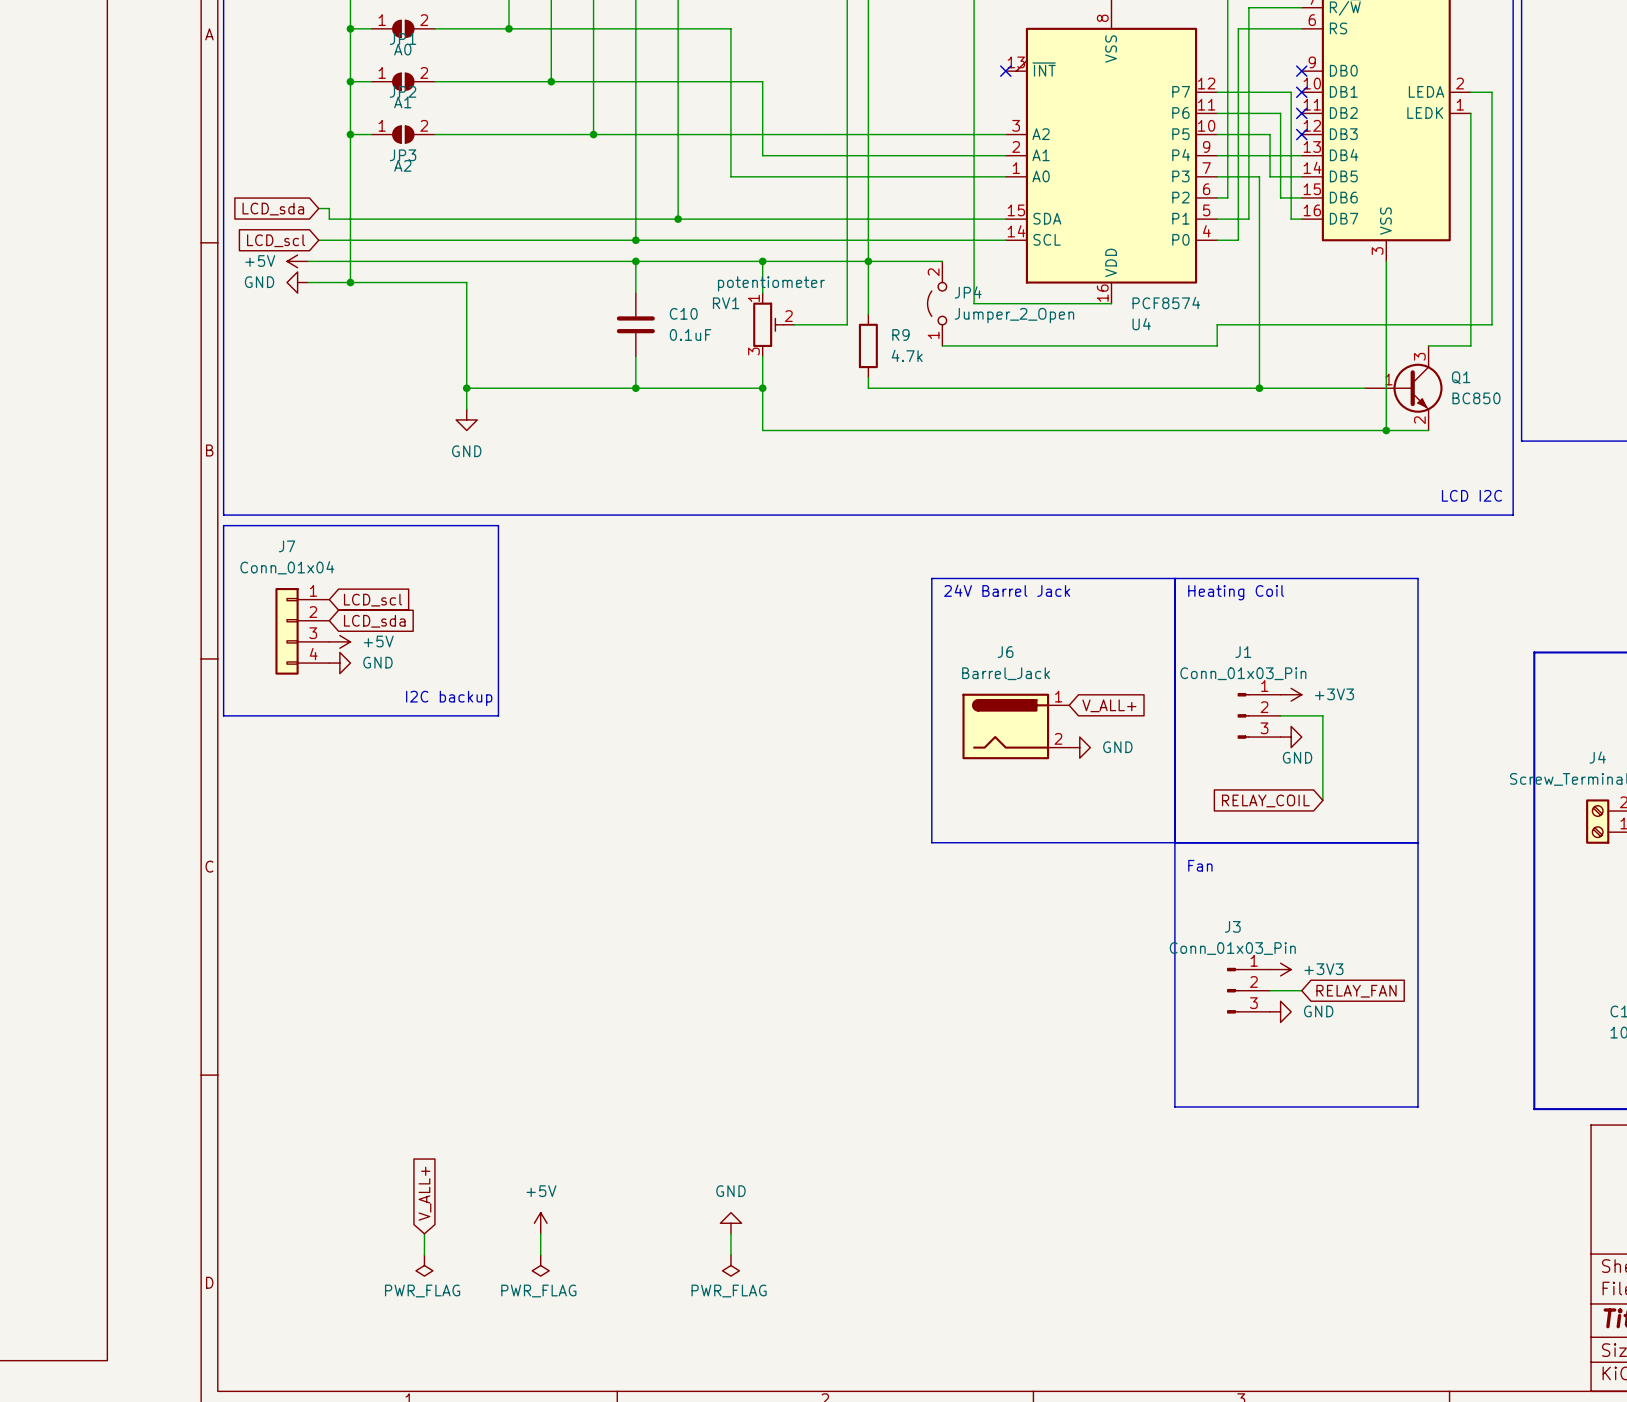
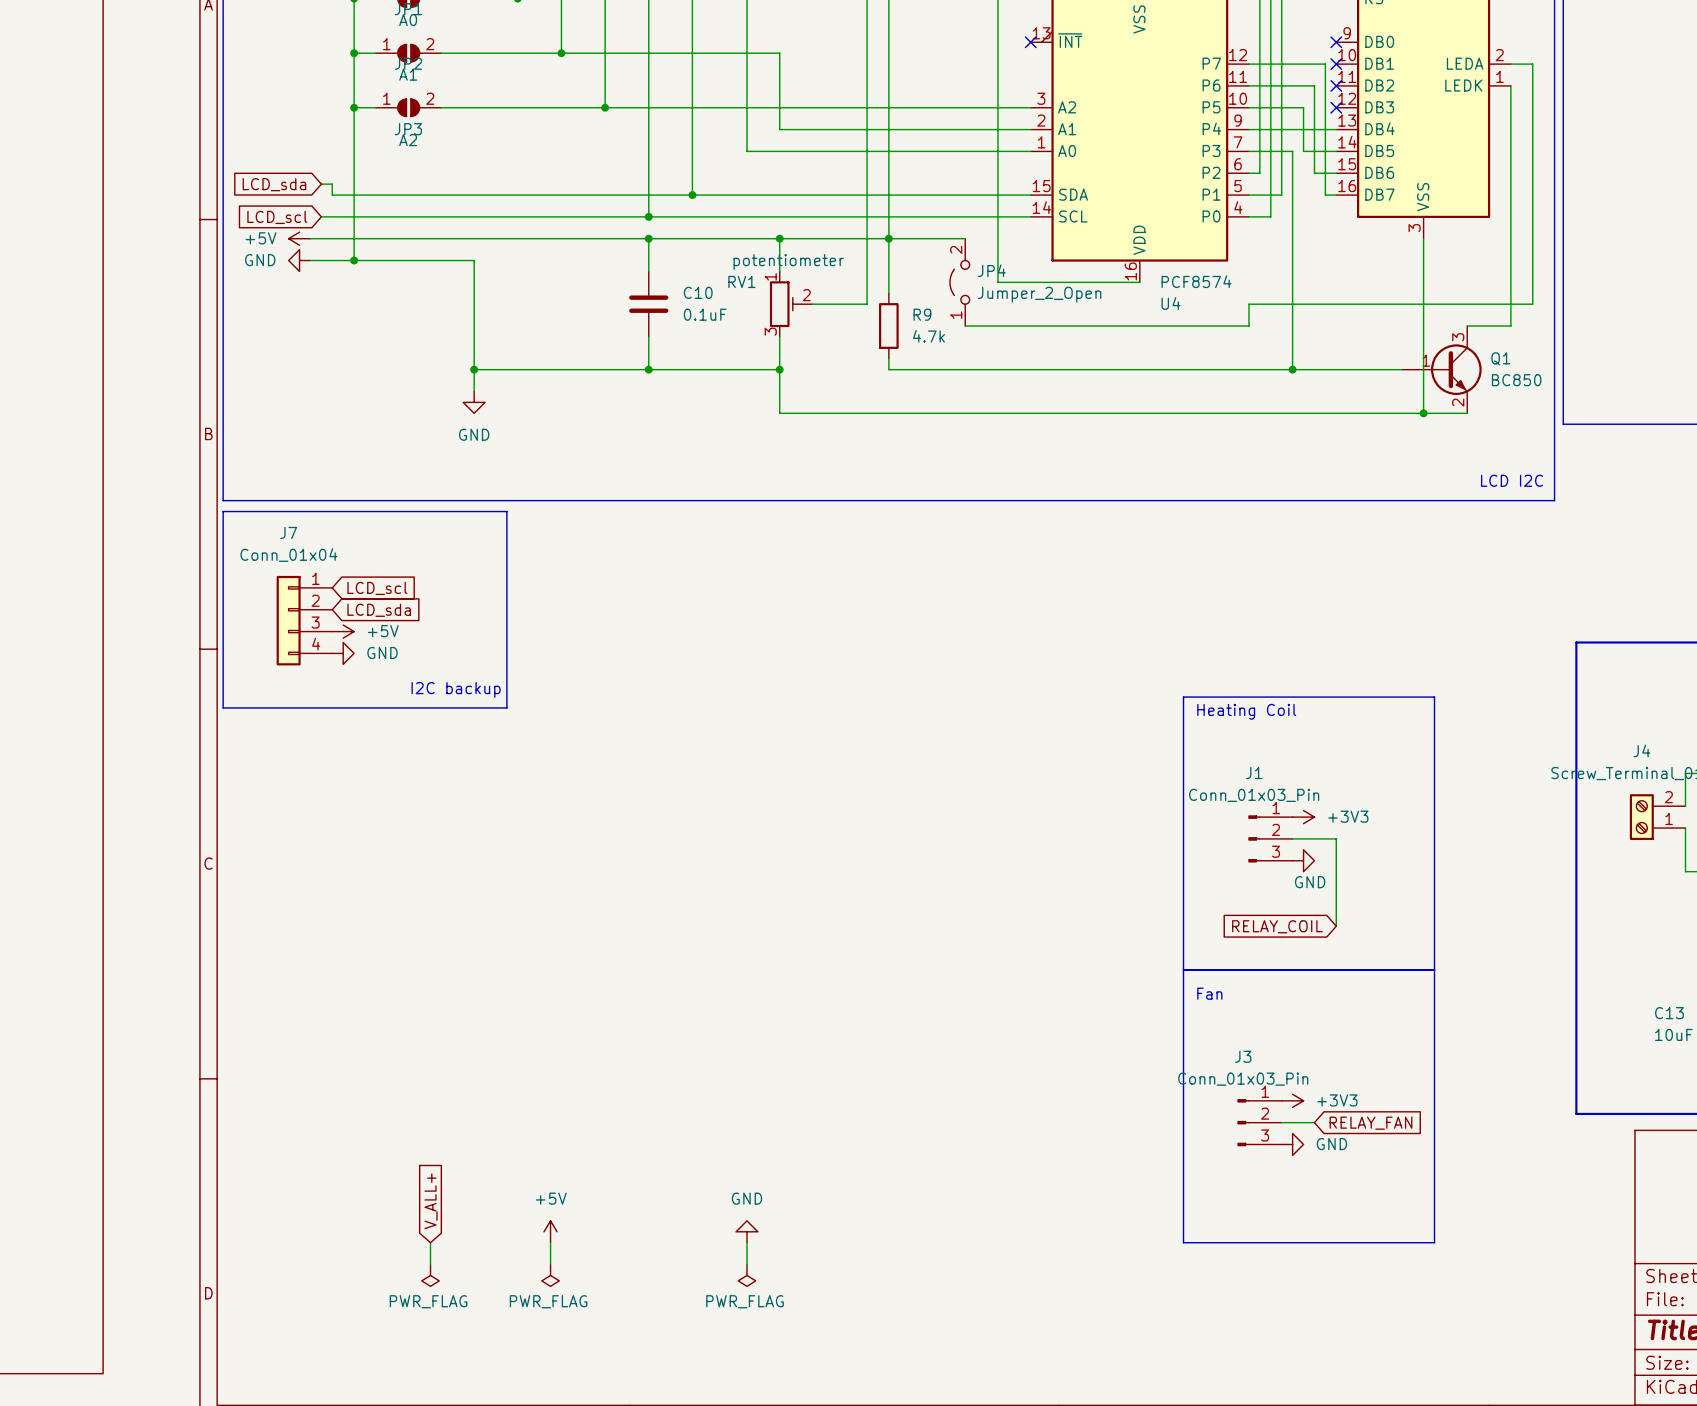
line: (1174, 578) (1174, 1106) (1418, 1106) (1418, 578) (931, 578) (931, 842) (1418, 842) -> none
text: 24V Barrel Jack (1007, 590) -> none
text position: Heating Coil (1236, 592) -> Heating Coil (1246, 711)
power symbol: +3V3 (1291, 694) -> none
global label: V_ALL+ (1109, 705) -> none
line: none -> (1183, 697) (1183, 1242) (1434, 1242) (1434, 697) (1183, 697)
J1 position: (1259, 715) -> (1270, 838)
wire: (1280, 715) (1322, 715) (1322, 800) -> (1292, 838) (1336, 838) (1336, 926)
J6: Barrel_Jack (1015, 726) -> none
power symbol: GND (1291, 737) -> none
power symbol: GND (1079, 747) -> none
global label position: RELAY_COIL (1265, 800) -> RELAY_COIL (1277, 926)
power symbol: none -> +3V3 (1303, 817)
power symbol: none -> GND (1303, 860)
text position: Fan (1200, 865) -> Fan (1209, 993)
line: none -> (1183, 969) (1434, 969)
power symbol: +3V3 (1280, 969) -> none
J3 position: (1248, 990) -> (1259, 1122)
wire: (1270, 990) (1301, 990) -> (1281, 1122) (1314, 1122)
global label position: RELAY_FAN (1356, 991) -> RELAY_FAN (1370, 1123)
power symbol: GND (1280, 1011) -> none
power symbol: none -> +3V3 (1292, 1100)
power symbol: none -> GND (1292, 1144)

